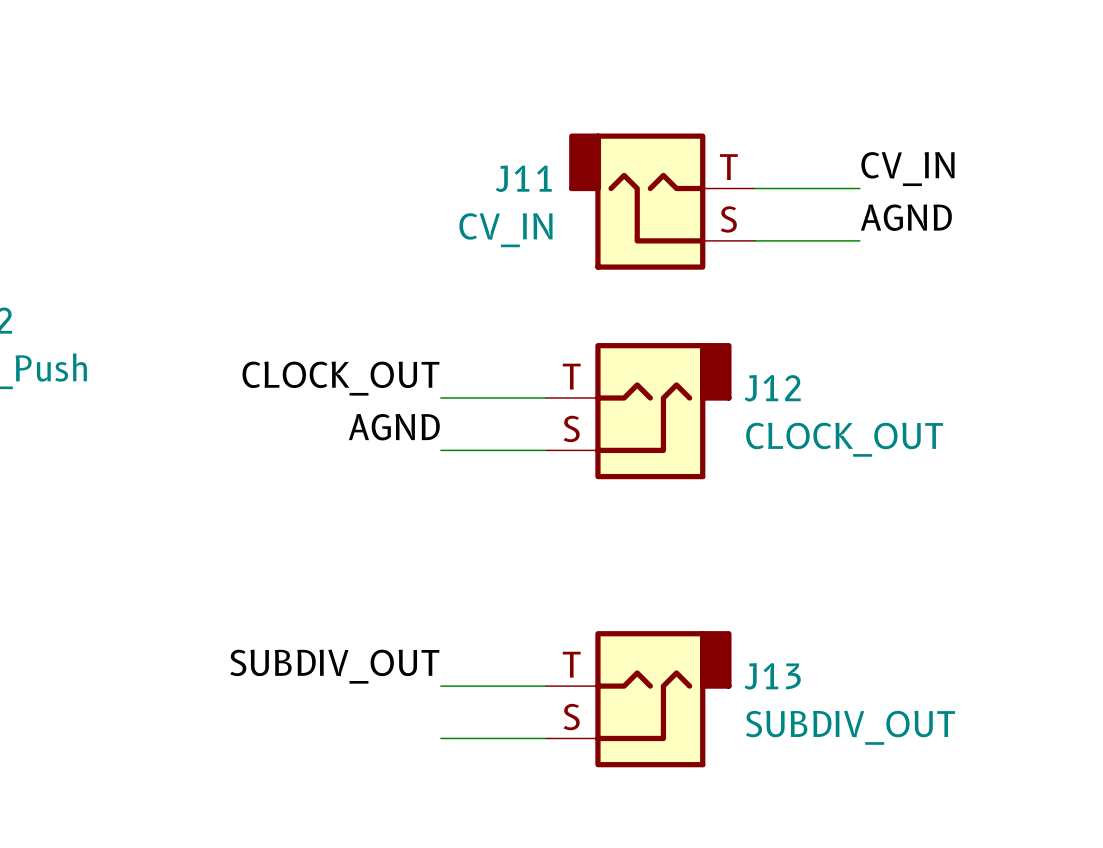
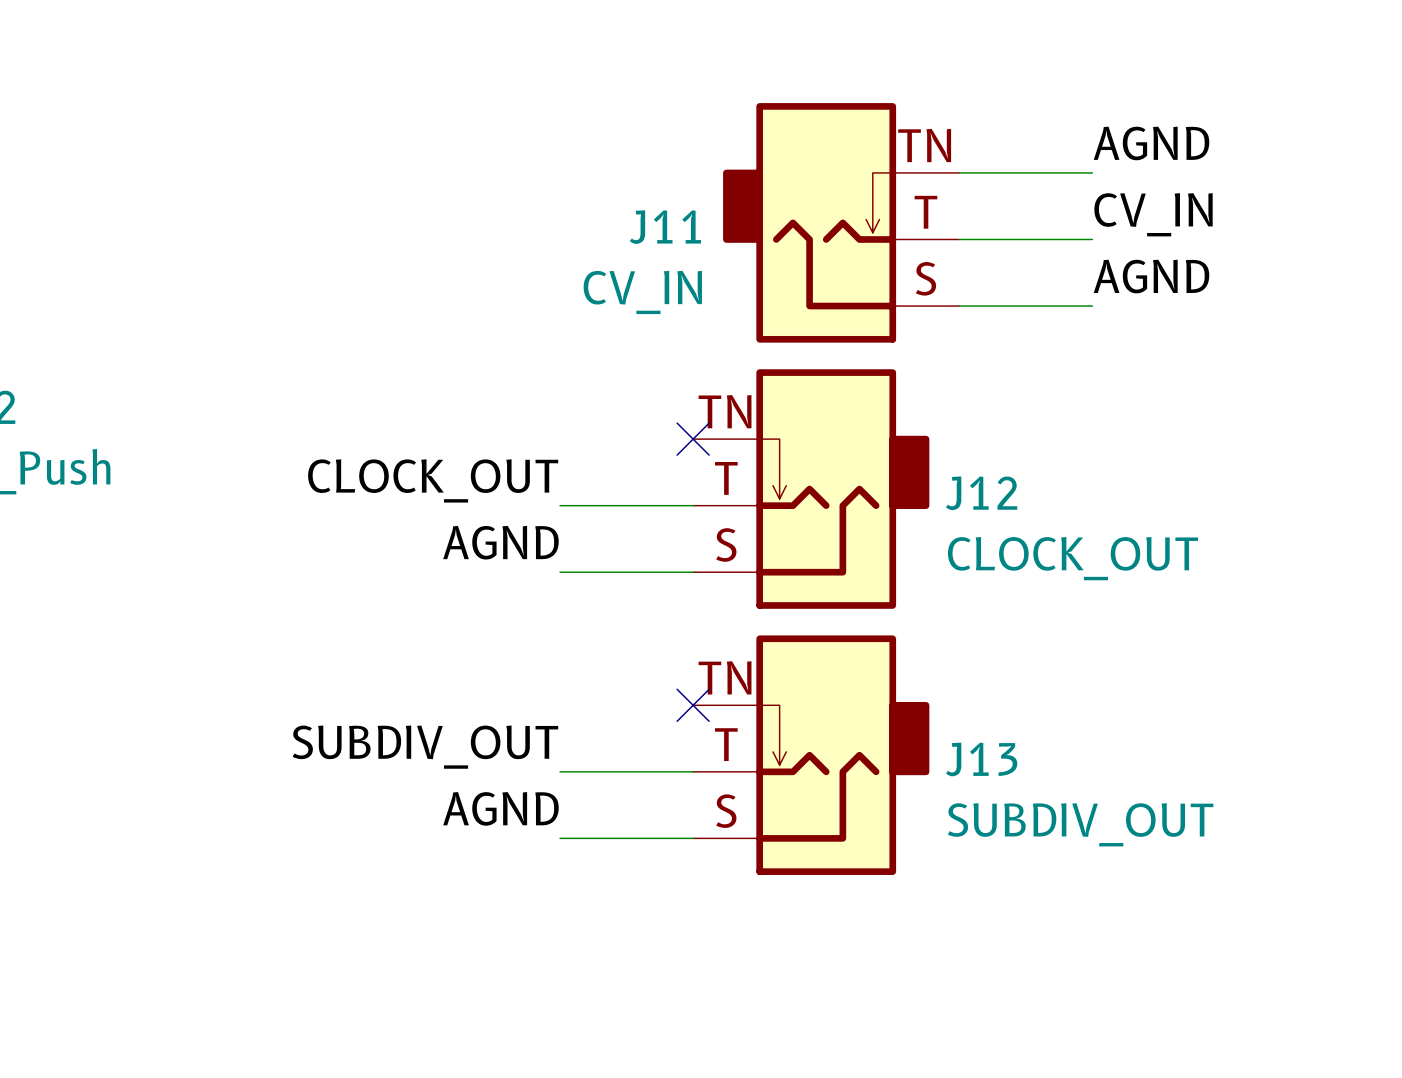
label: none -> AGND (1151, 143)
J11 symbol: [569, 133, 756, 270] -> [723, 103, 960, 343]
wire: none -> (959, 172) (1092, 172)
J12 symbol: [545, 343, 732, 480] -> [693, 369, 930, 609]
no-connect mark: none -> (693, 439)
no-connect mark: none -> (693, 705)
J13 symbol: [545, 631, 732, 768] -> [693, 635, 930, 875]
label: none -> AGND (500, 808)
label position: SUBDIV_OUT (334, 666) -> SUBDIV_OUT (425, 747)
wire: (440, 686) (545, 686) -> (560, 771) (693, 771)
wire: (440, 738) (545, 738) -> (560, 838) (693, 838)

